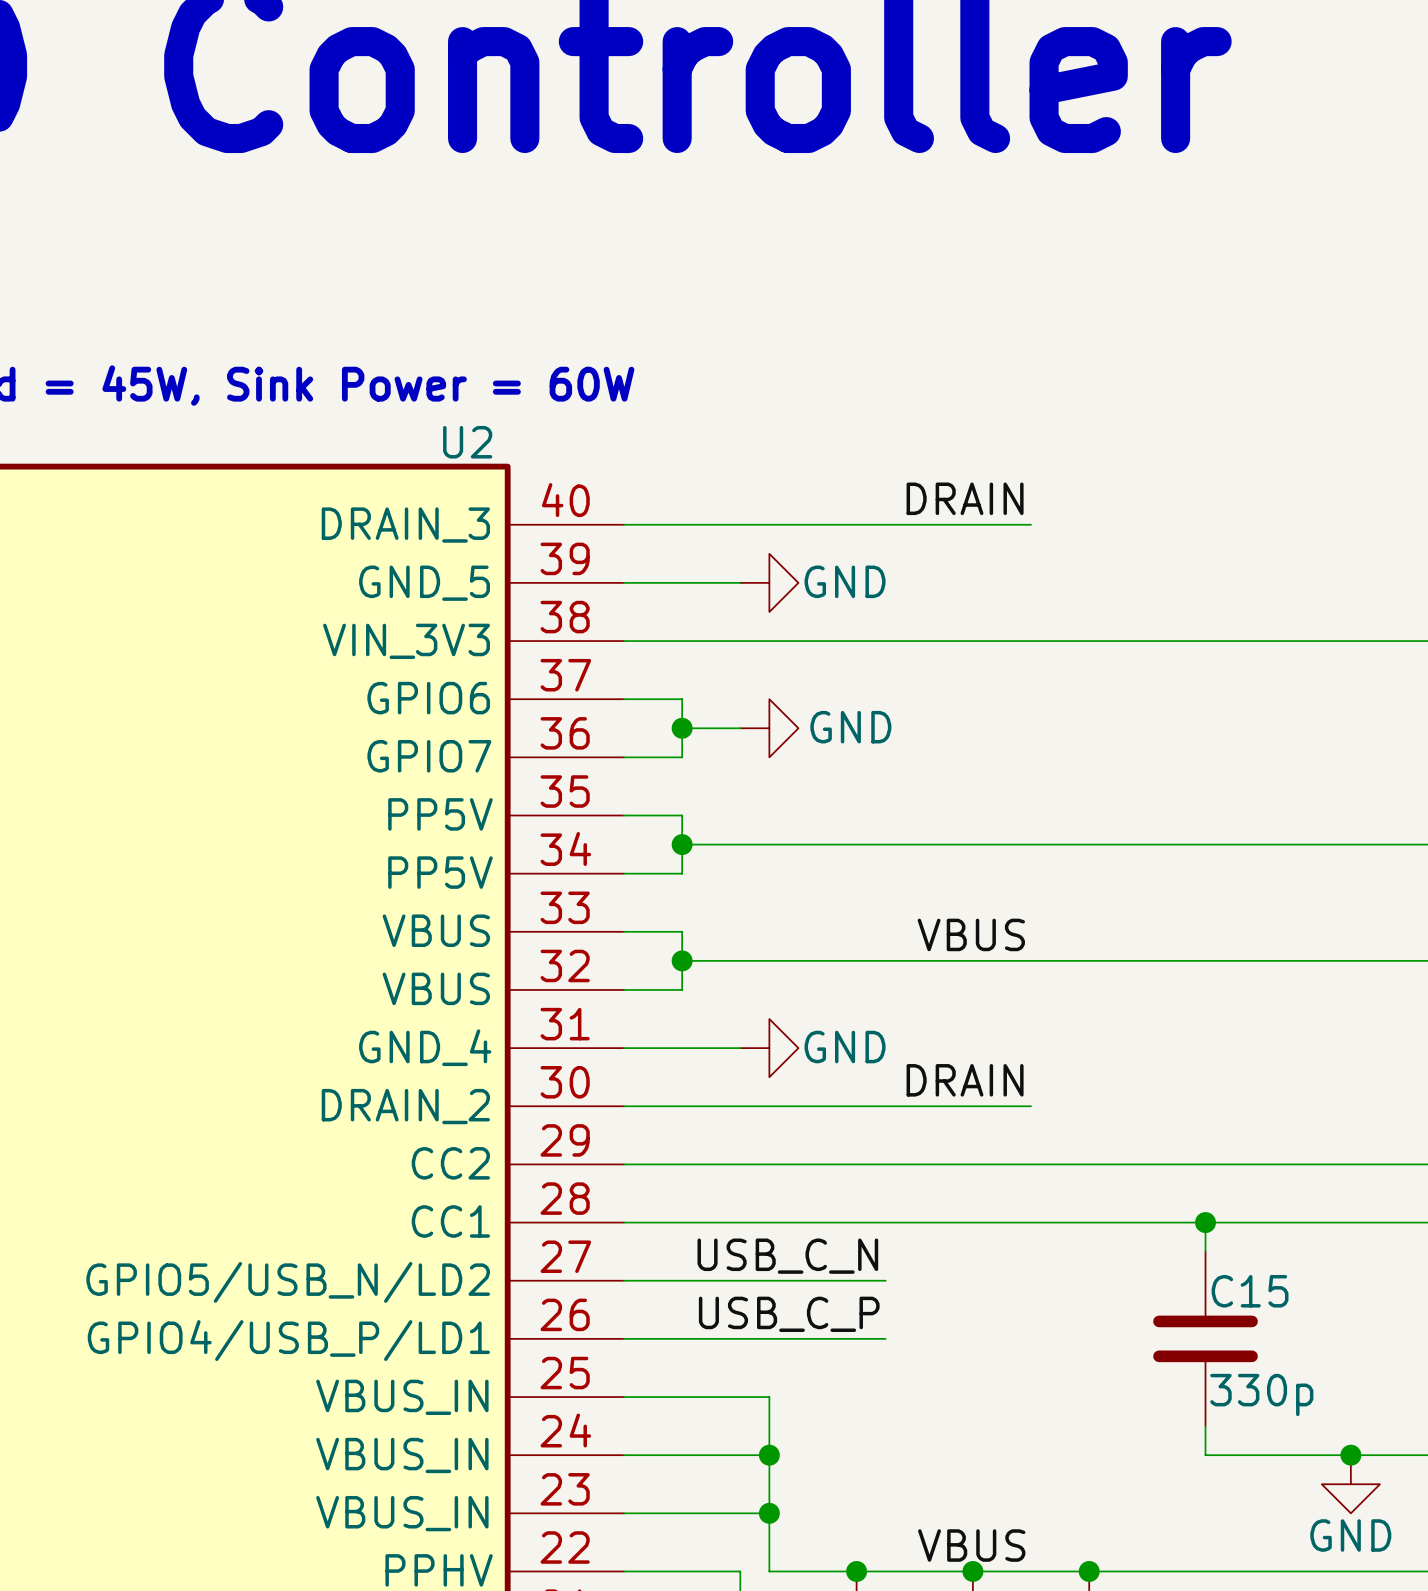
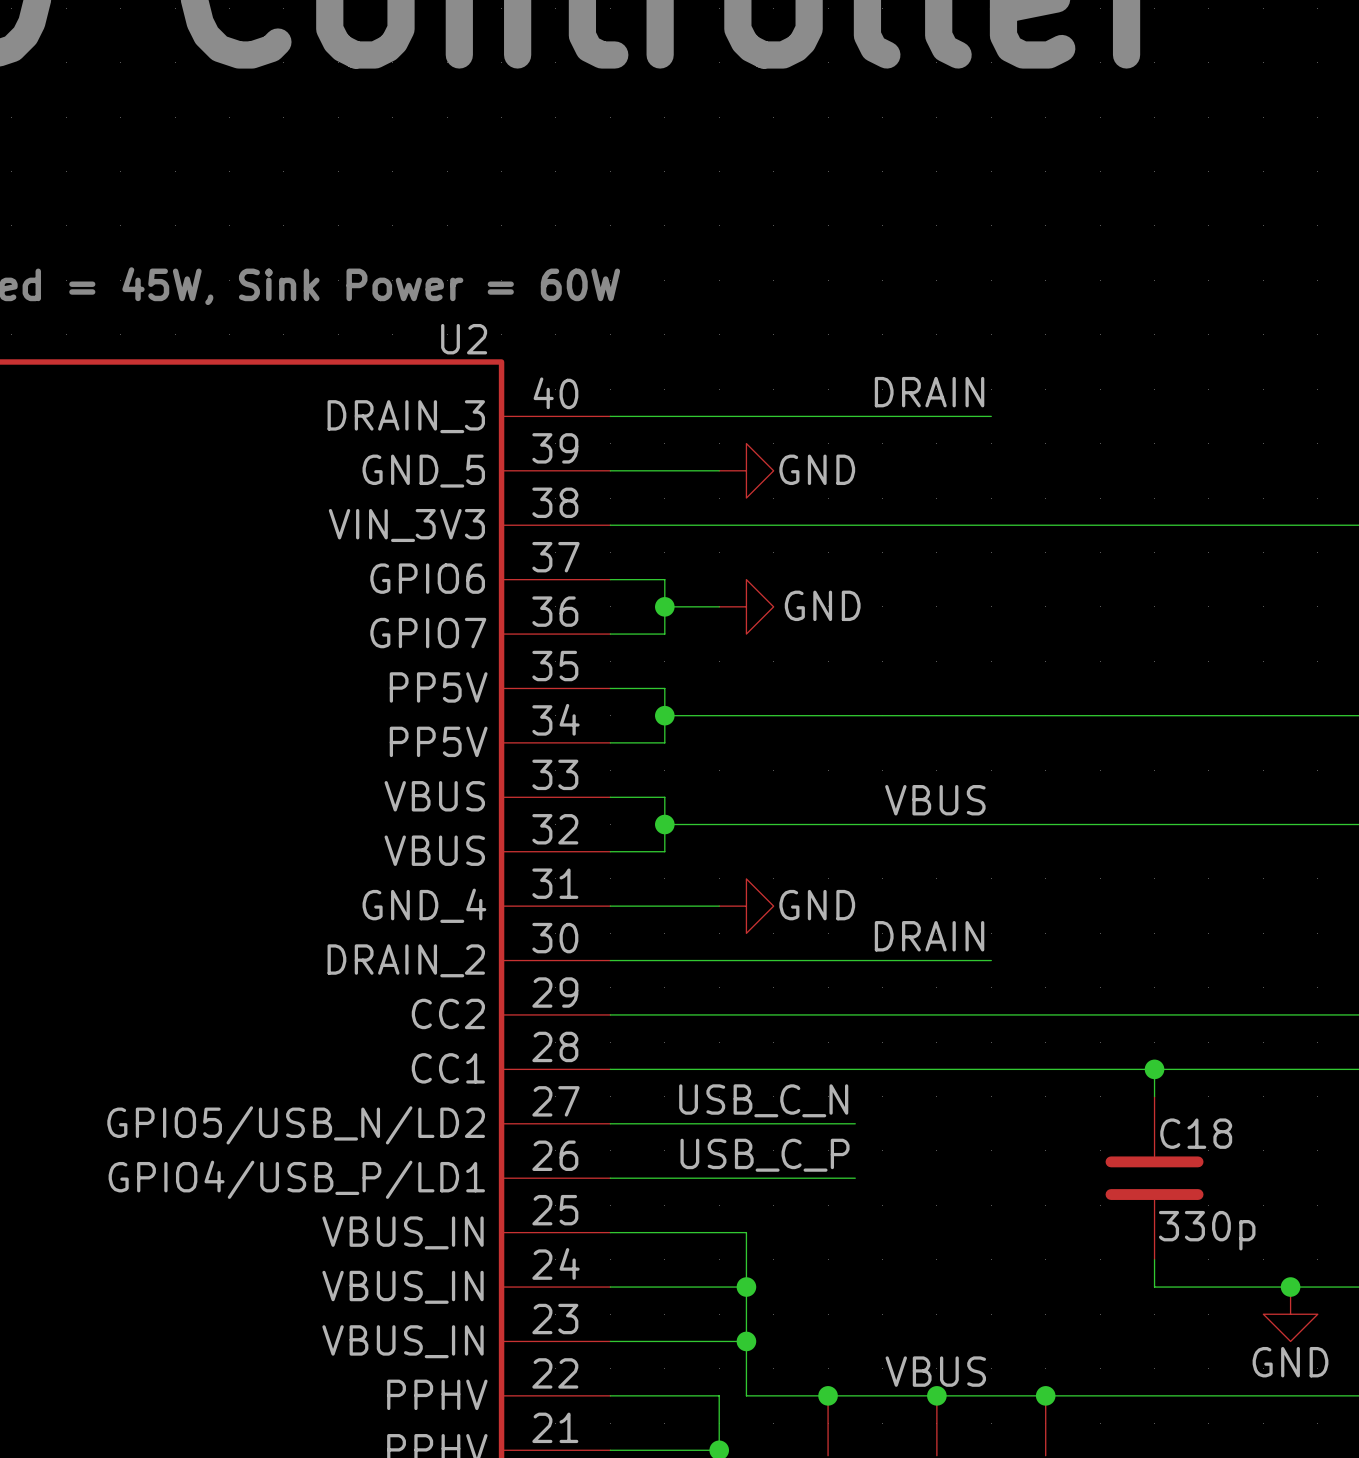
C15 name: C15 (1250, 1291) -> C18 (1196, 1133)

